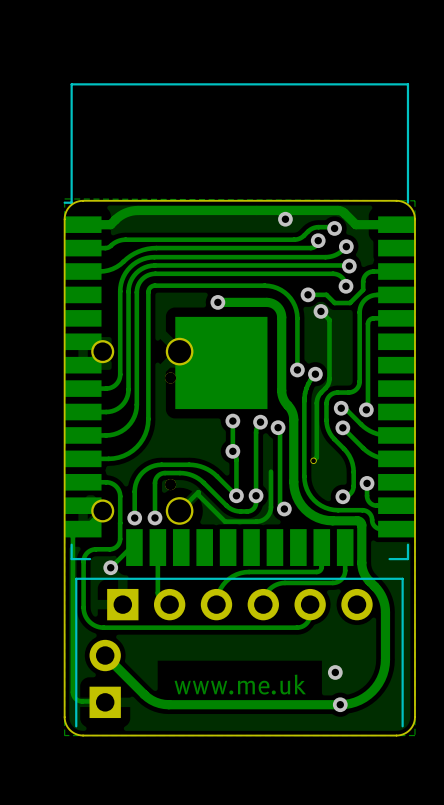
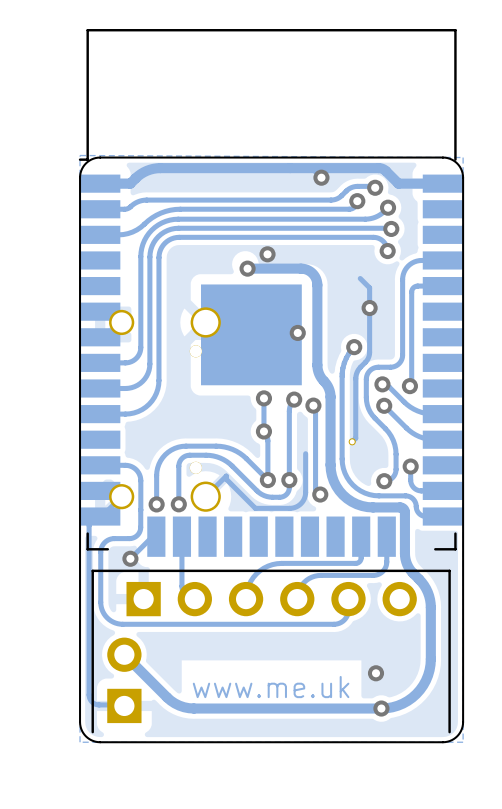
track: (396, 271) (368, 273) (363, 279) (363, 289) (350, 303) (334, 303) (326, 294) (308, 294) -> none
via: none -> (267, 254)
via: (308, 294) -> none
via: (320, 311) -> none
via: none -> (369, 308)
via: none -> (297, 332)
track: (297, 369) (296, 309) (290, 298) (281, 290) (264, 285) (152, 286) (148, 292) (148, 419) (145, 434) (136, 447) (123, 455) (113, 458) (83, 458) -> none
via: (297, 369) -> none

